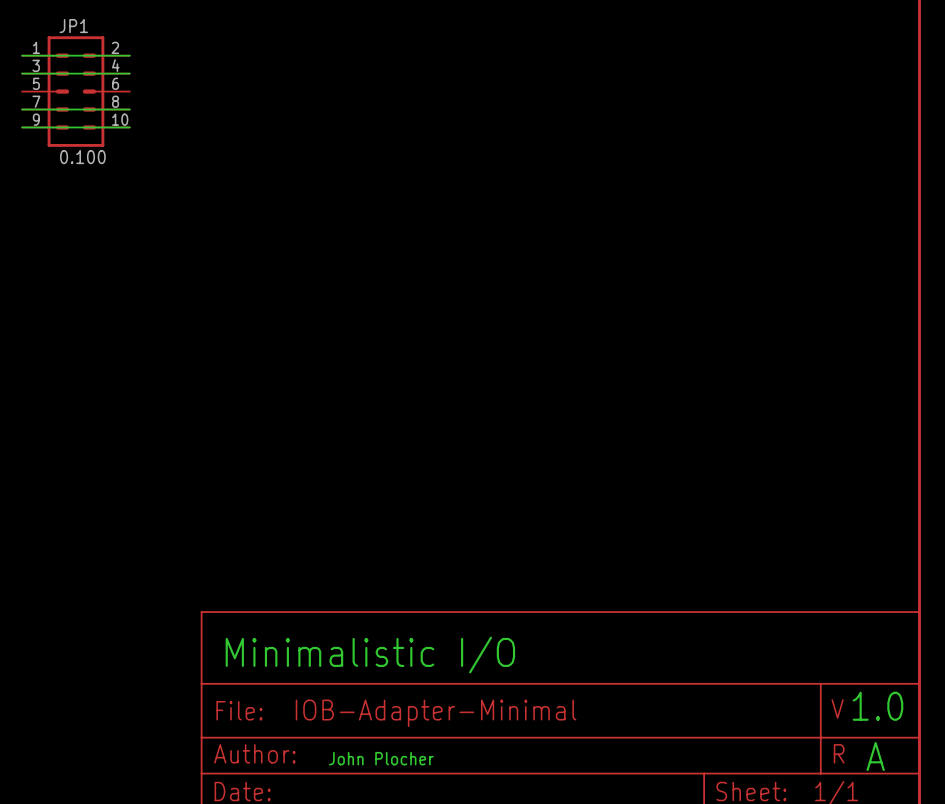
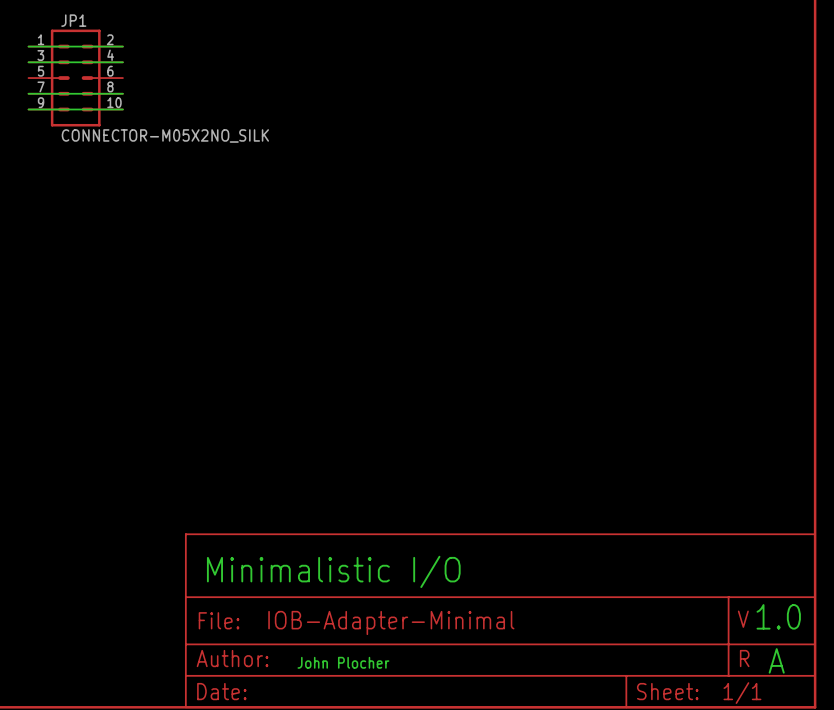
JP1 value: 0.100 (82, 157) -> CONNECTOR-M05X2NO_SILK (165, 135)

